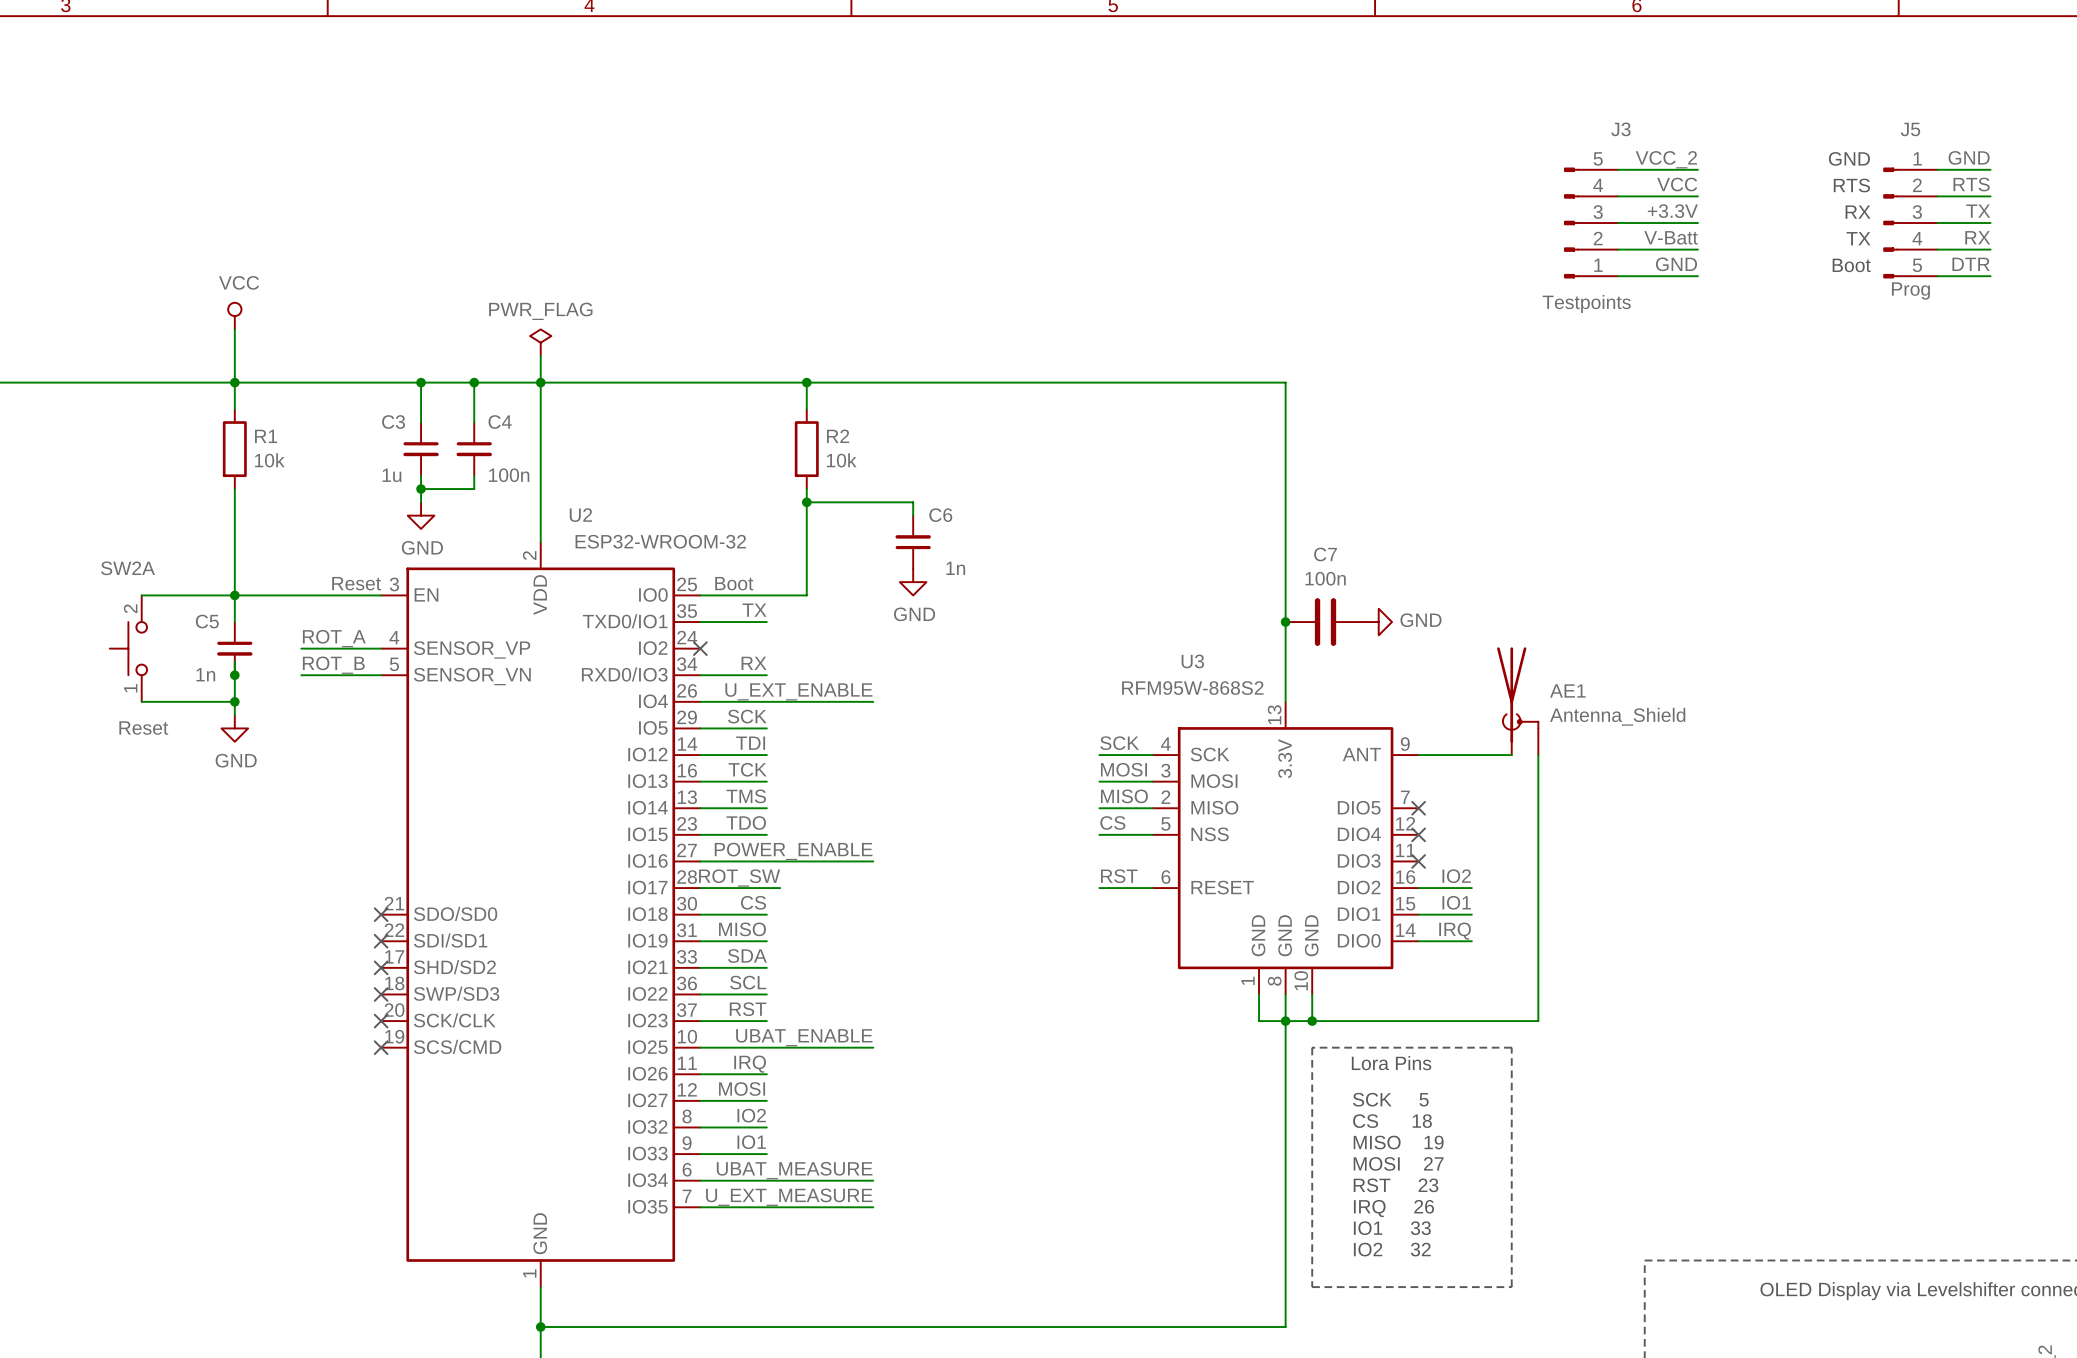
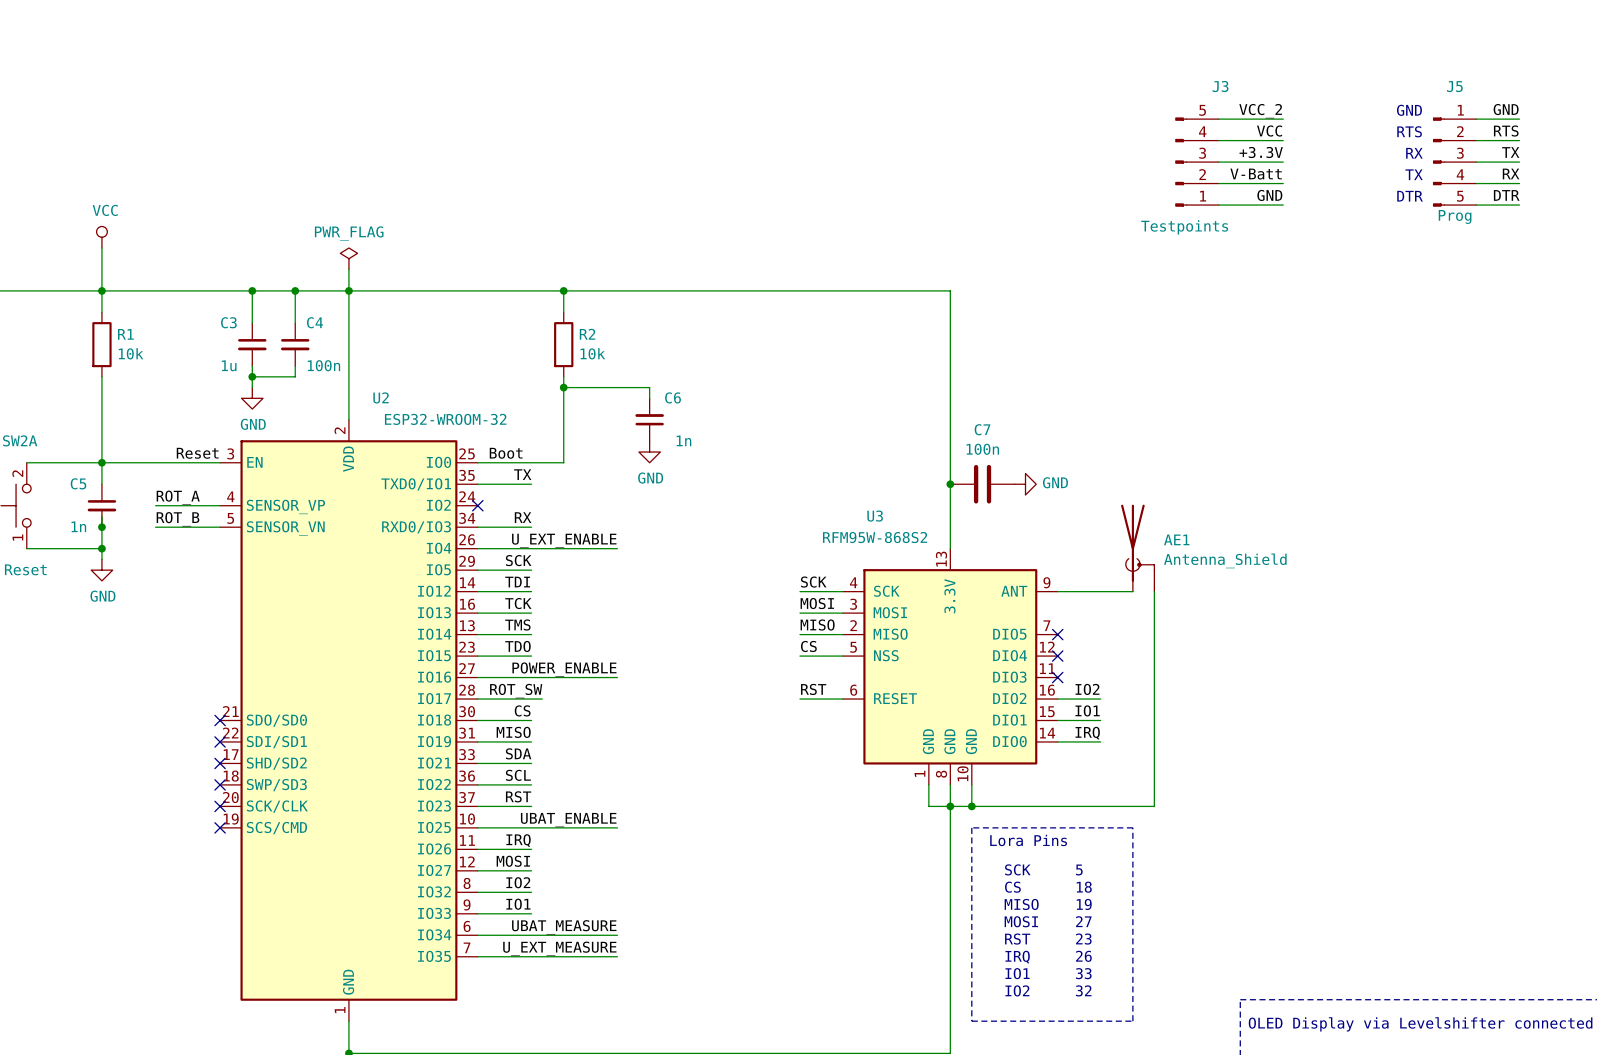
text: Boot (1851, 265) -> DTR (1410, 196)

